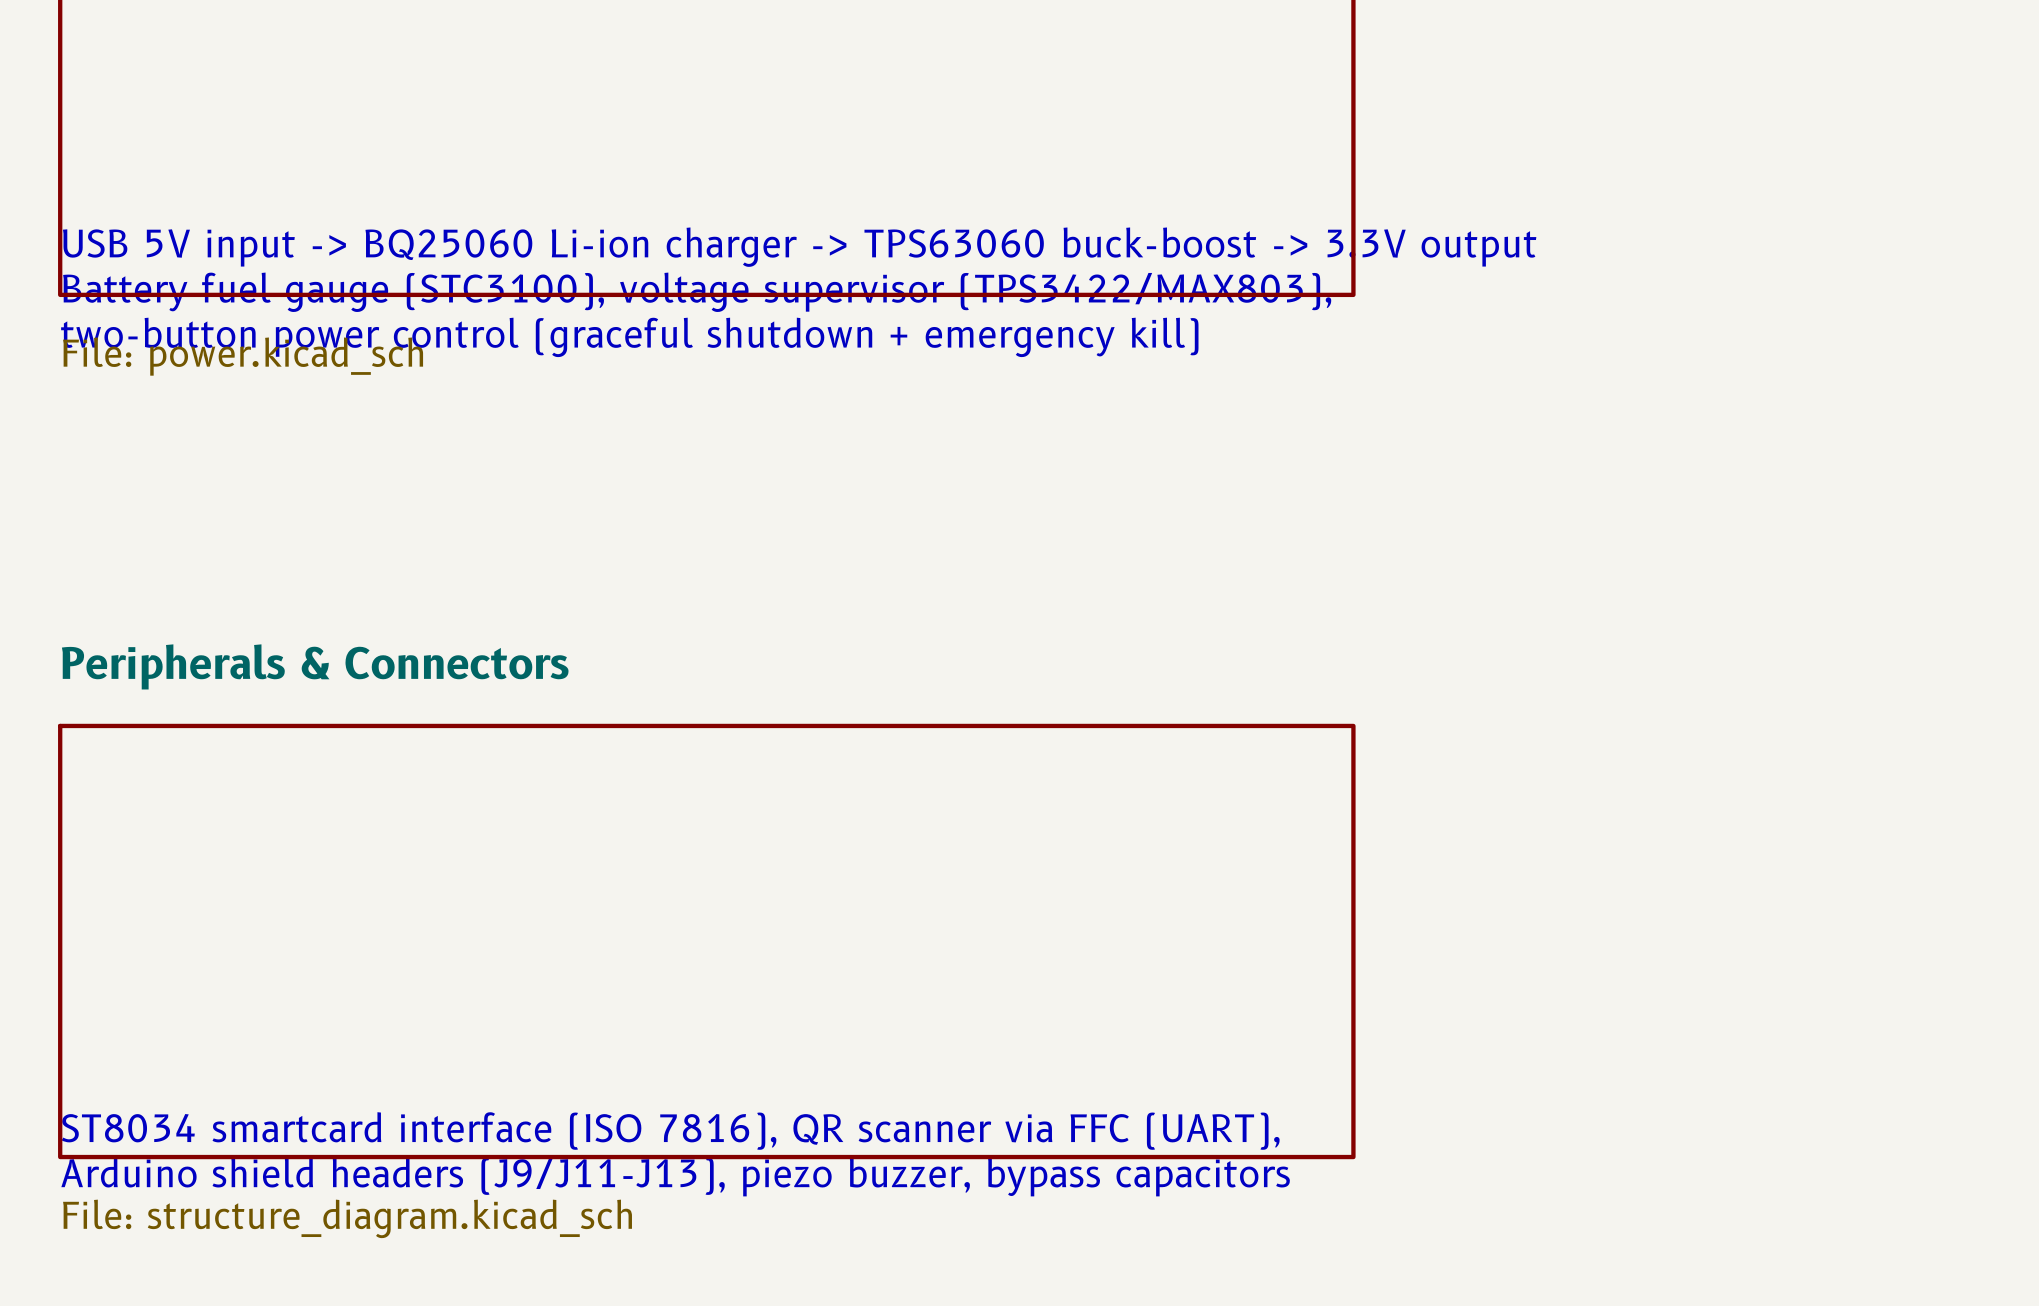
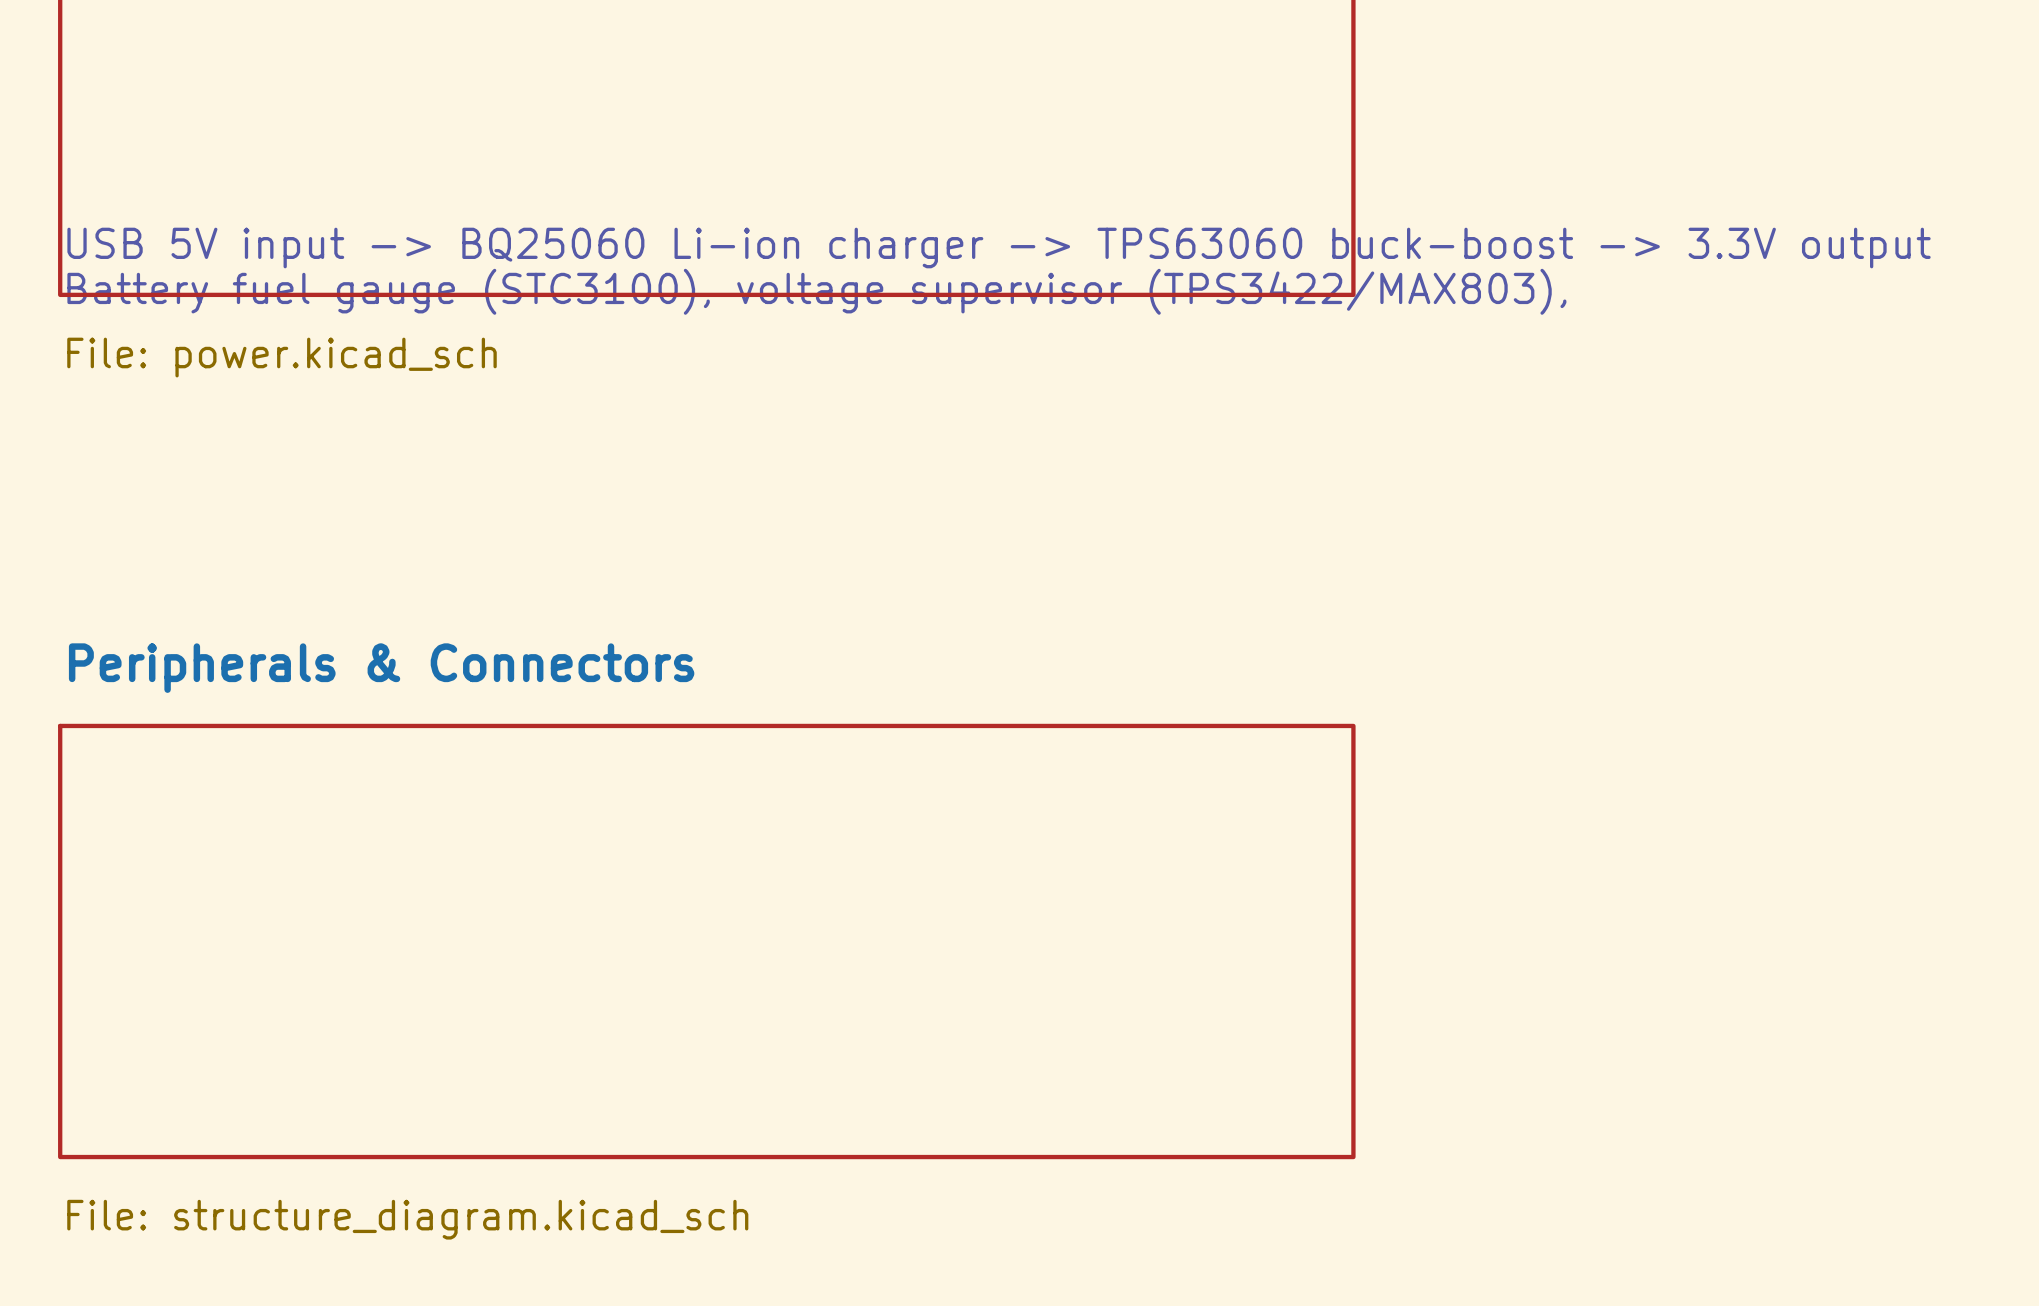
text: two-button power control (graceful shutdown + emergency kill) (629, 337) -> none
text: ST8034 smartcard interface (ISO 7816), QR scanner via FFC (UART), (670, 1130) -> none
text: Arduino shield headers (J9/J11-J13), piezo buzzer, bypass capacitors (675, 1176) -> none

